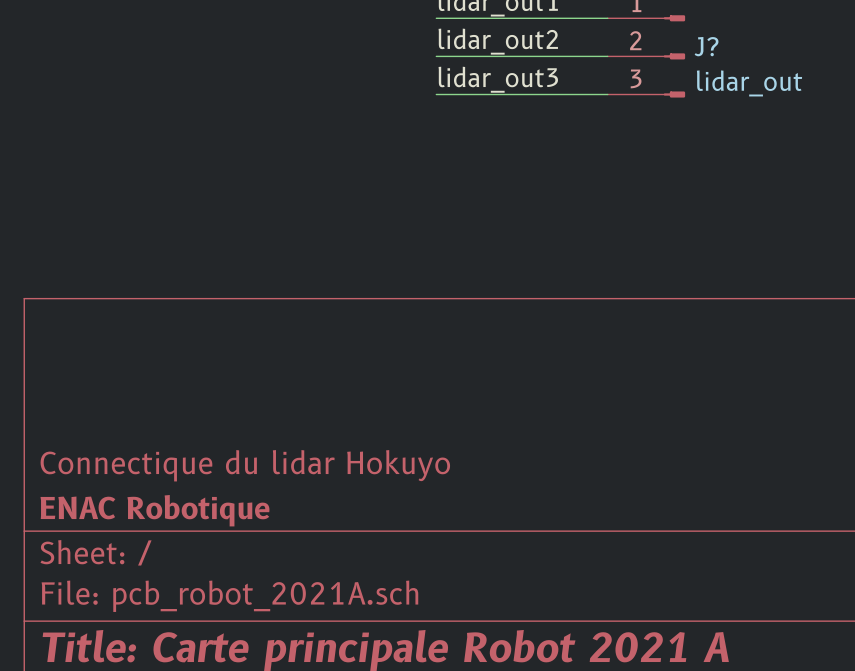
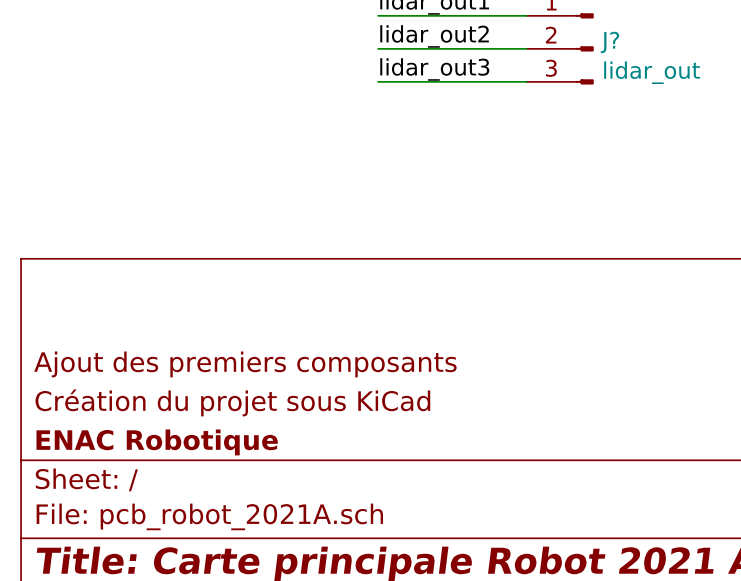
title block: none -> Ajout des premiers composants (245, 364)
title block: Connectique du lidar Hokuyo (245, 465) -> Création du projet sous KiCad (232, 402)

